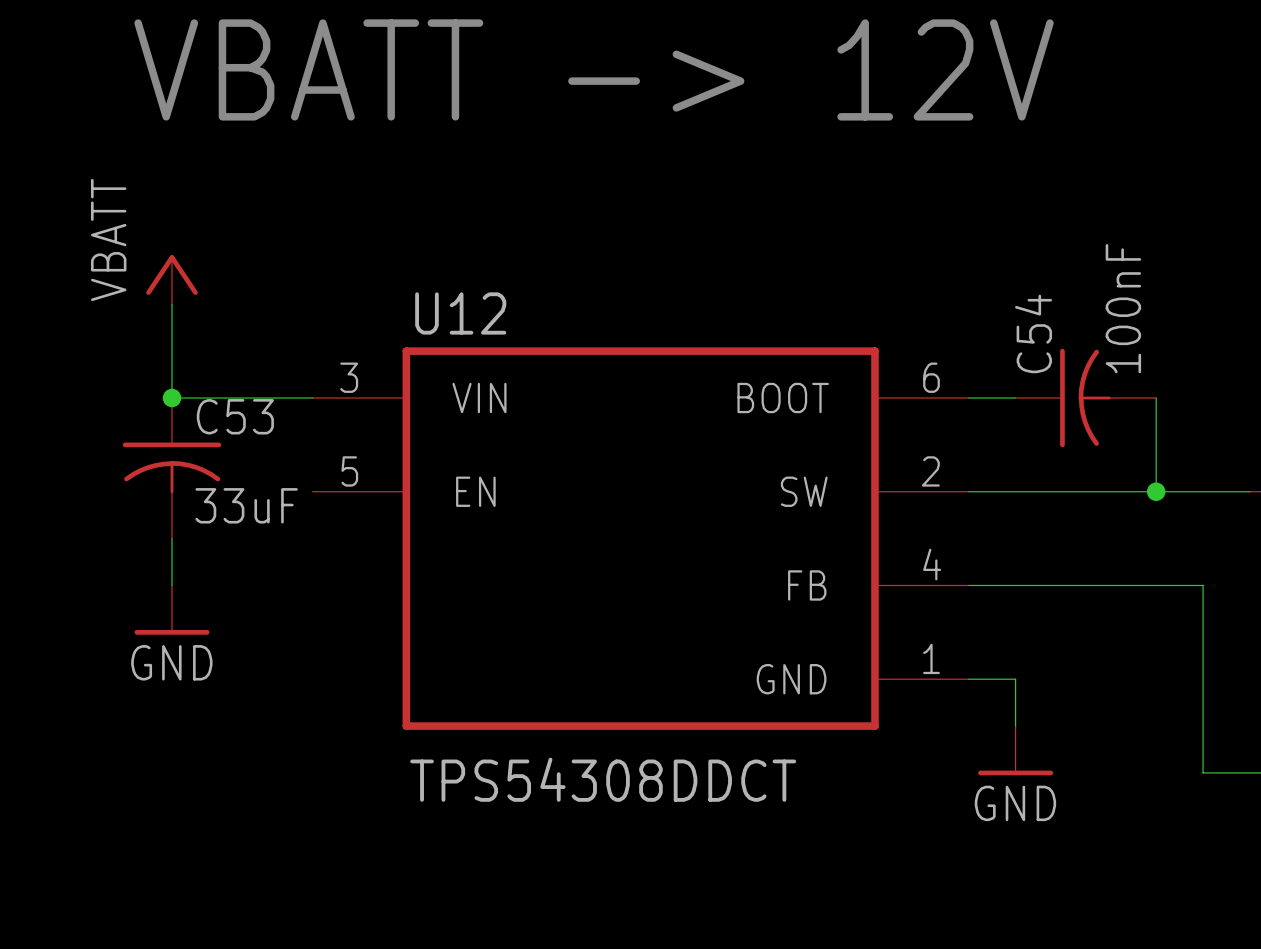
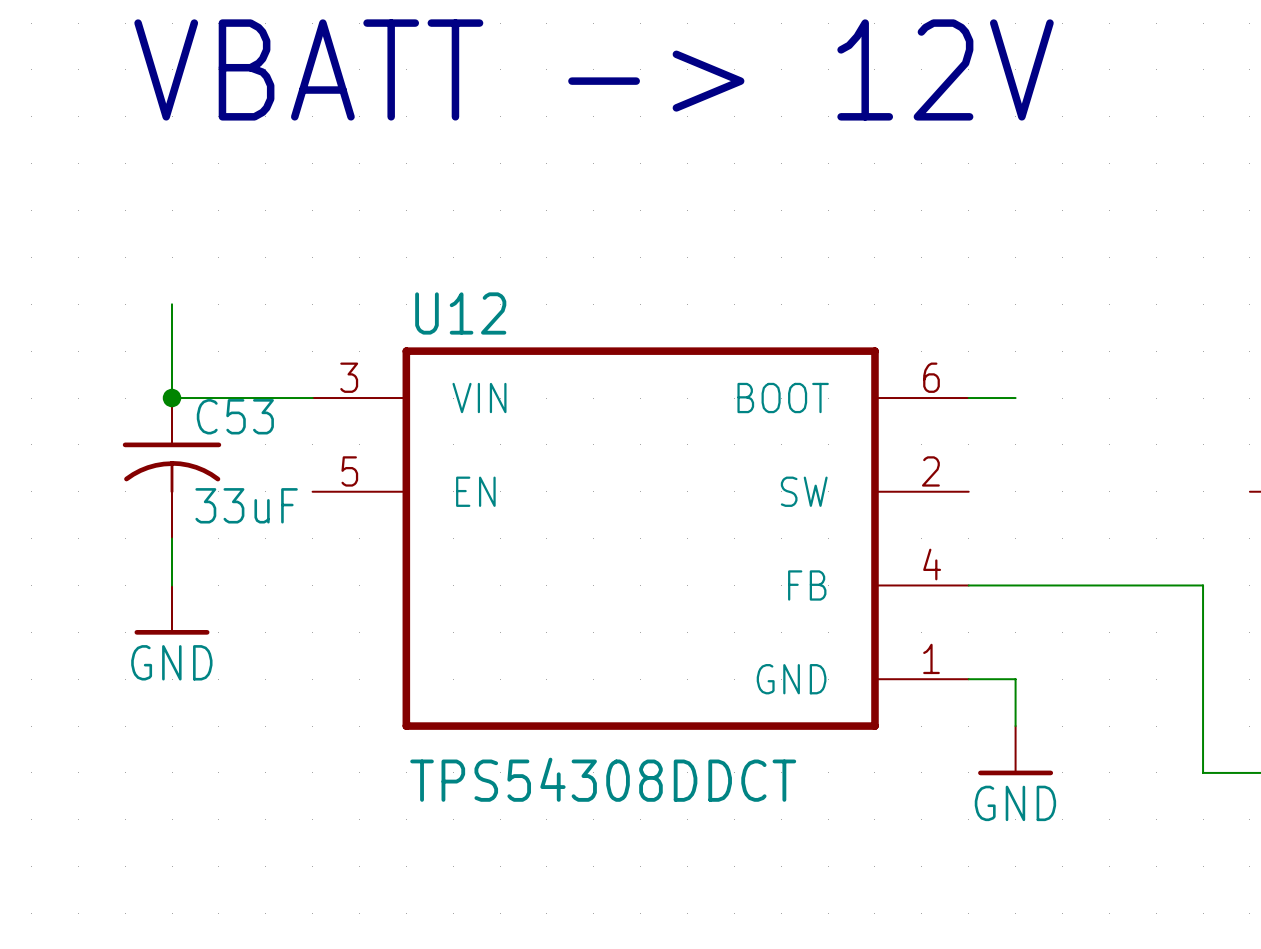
power symbol: VBATT (172, 279) -> none
C54: 100nF (1085, 398) -> none
wire: (1156, 398) (1156, 491) -> none
wire: (968, 491) (1249, 491) -> none
junction: (1156, 491) -> none

